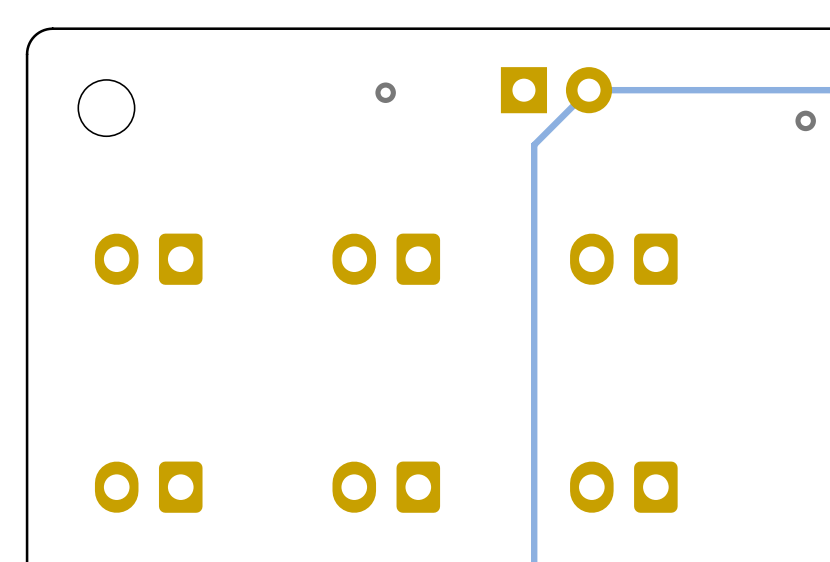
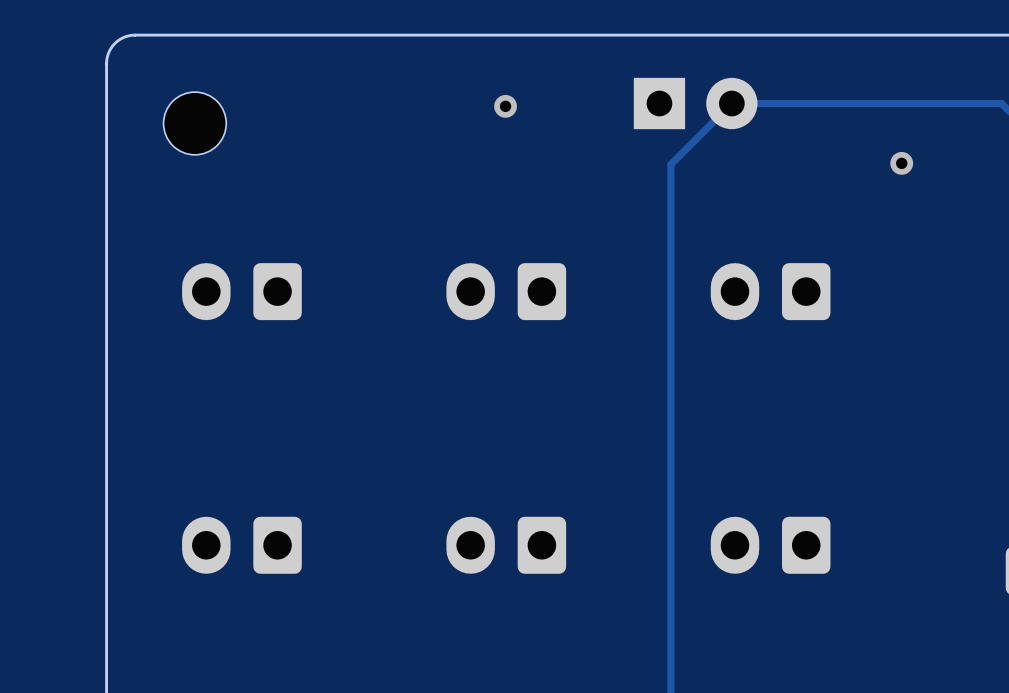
via position: (805, 120) -> (901, 163)

